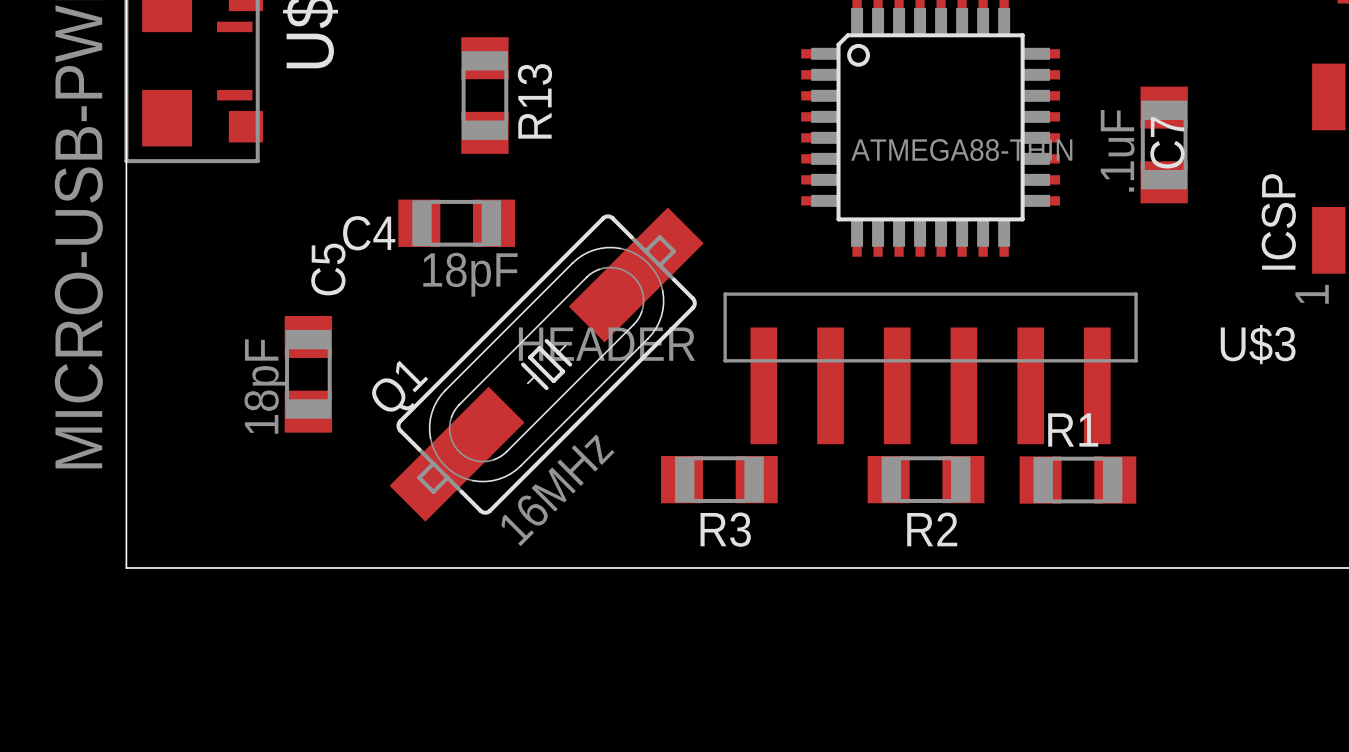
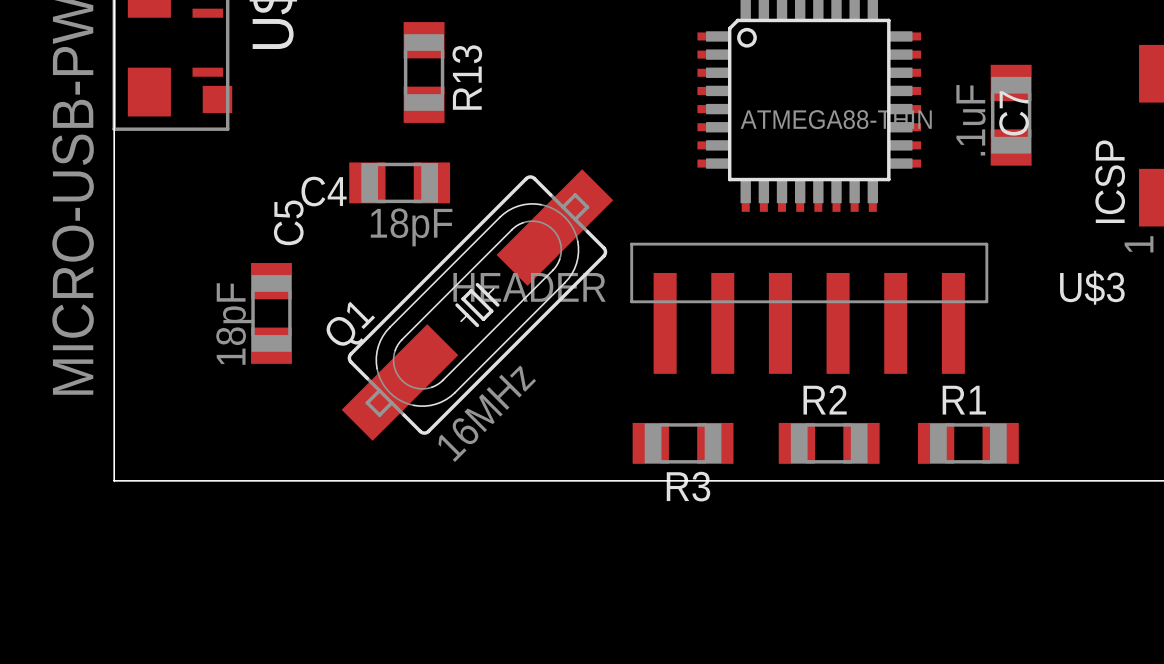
R3 position: (719, 479) -> (683, 443)
R2 position: (926, 479) -> (829, 443)
R1 position: (1077, 480) -> (968, 443)
R2 name position: R2 (932, 529) -> R2 (825, 399)

